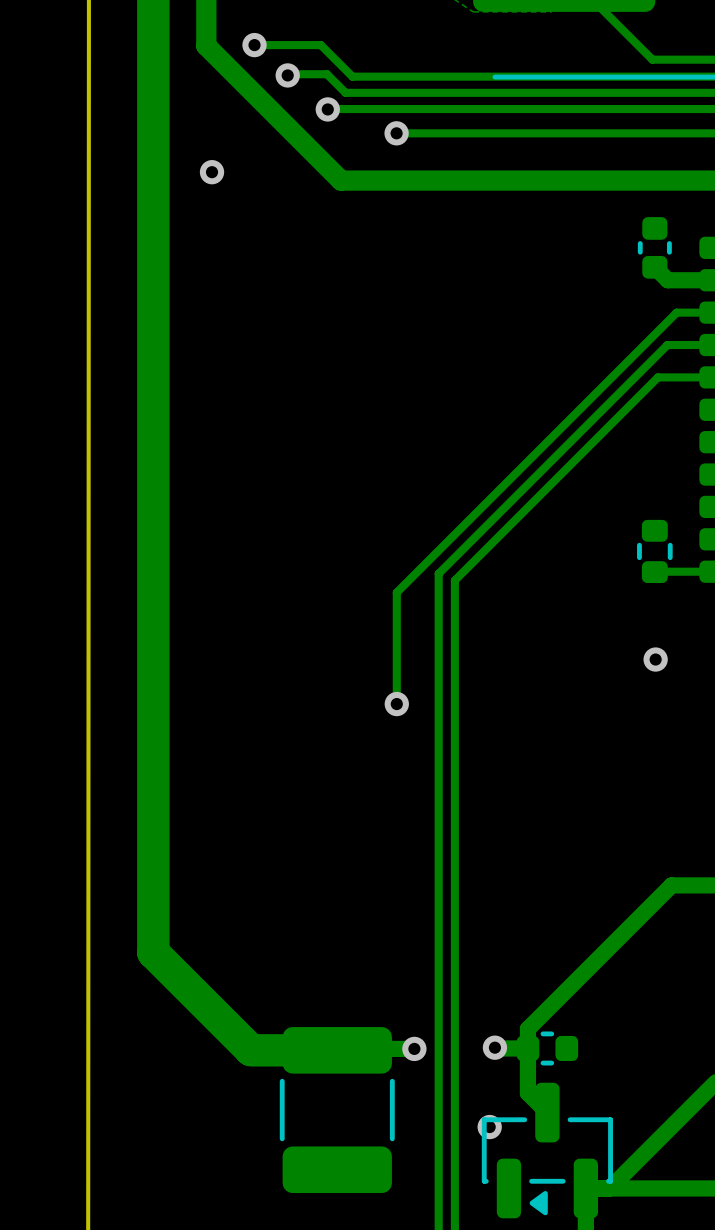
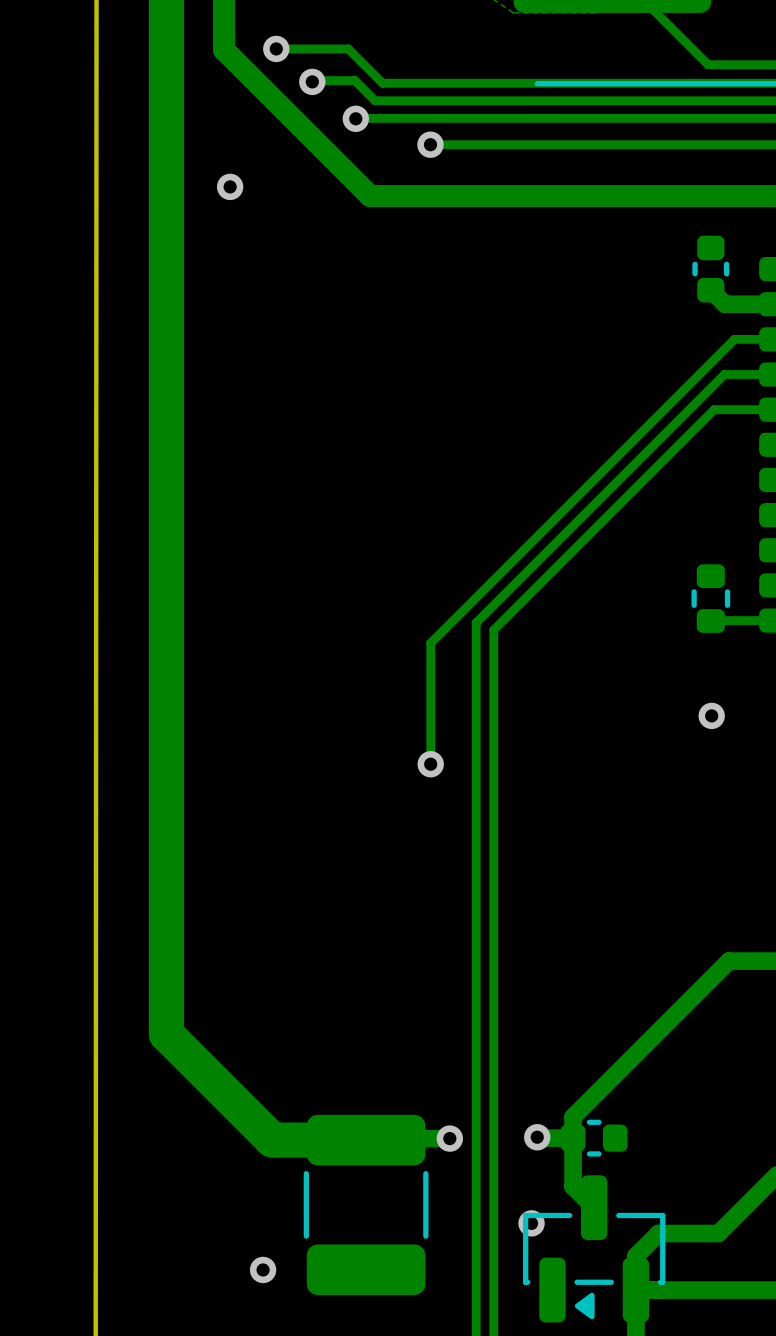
track: (661, 1136) (609, 1188) -> (718, 1233) (658, 1233) (635, 1256) (635, 1290)
via: none -> (263, 1269)

